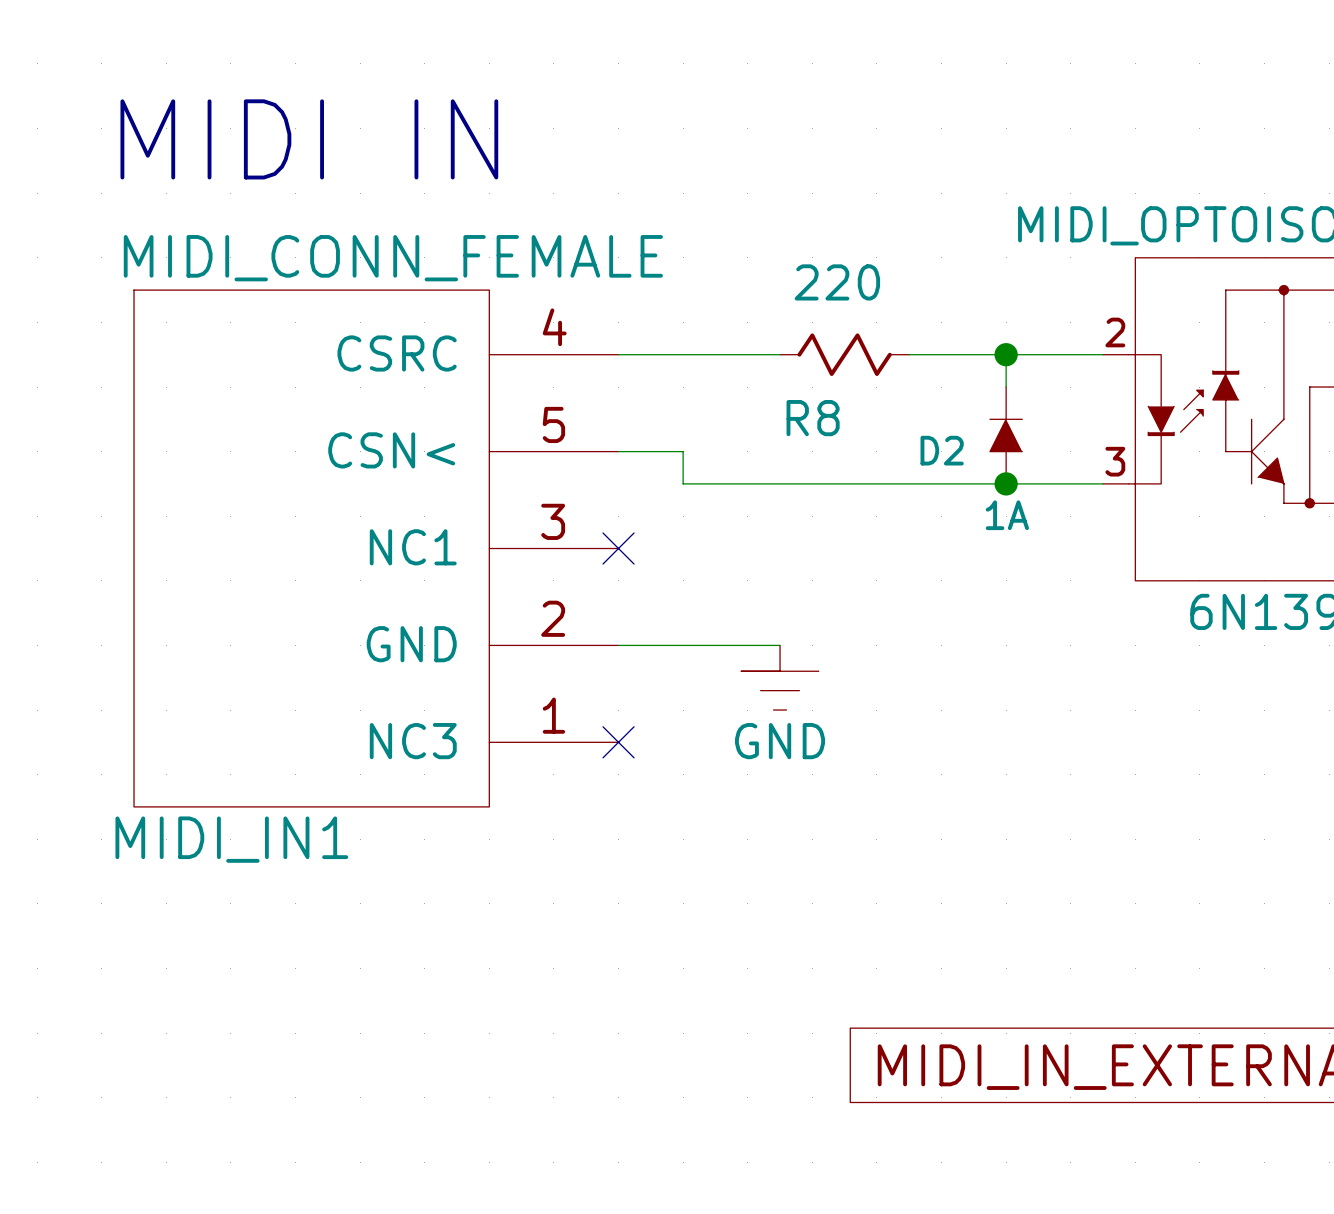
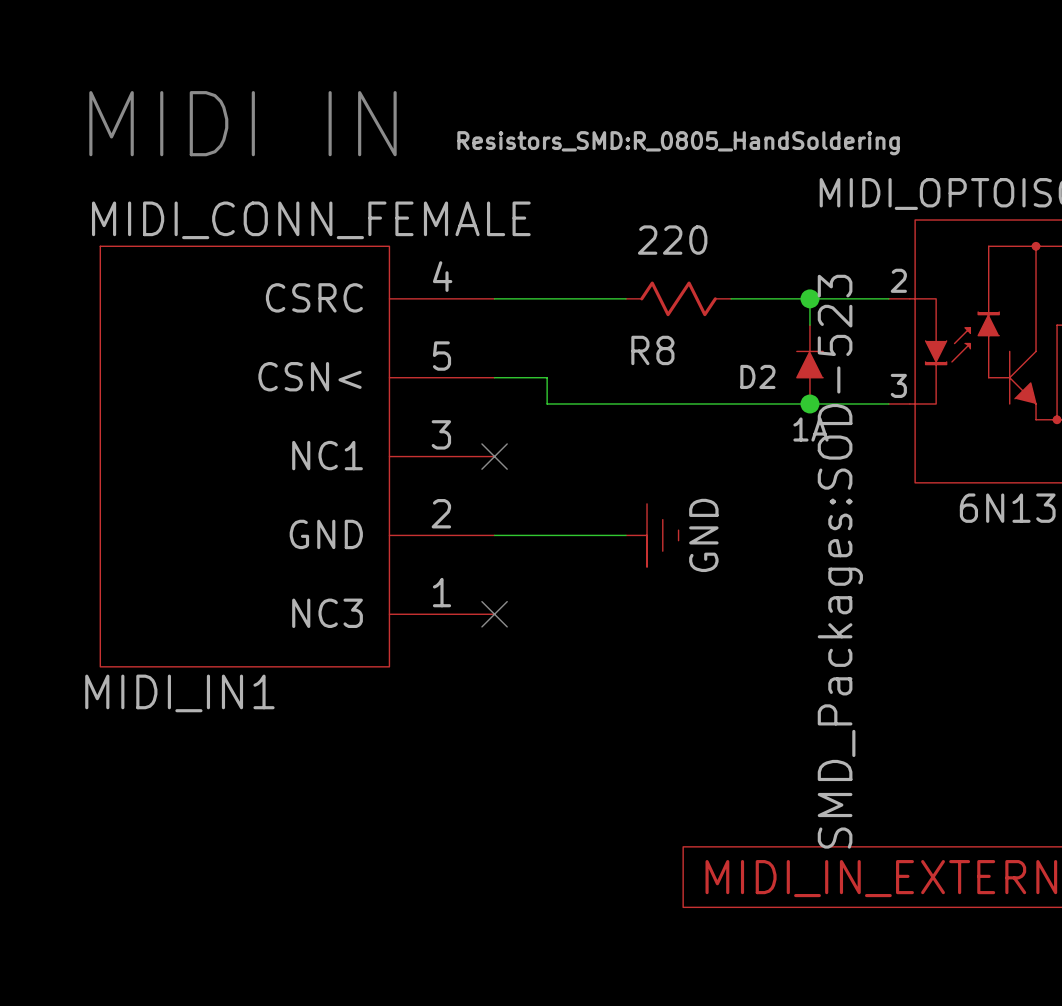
R8 text: none -> Resistors_SMD:R_0805_HandSoldering (678, 143)
power symbol rotation: 0° (780, 677) -> 90° counterclockwise (652, 535)
D2 text: none -> SMD_Packages:SOD-523 (840, 561)

